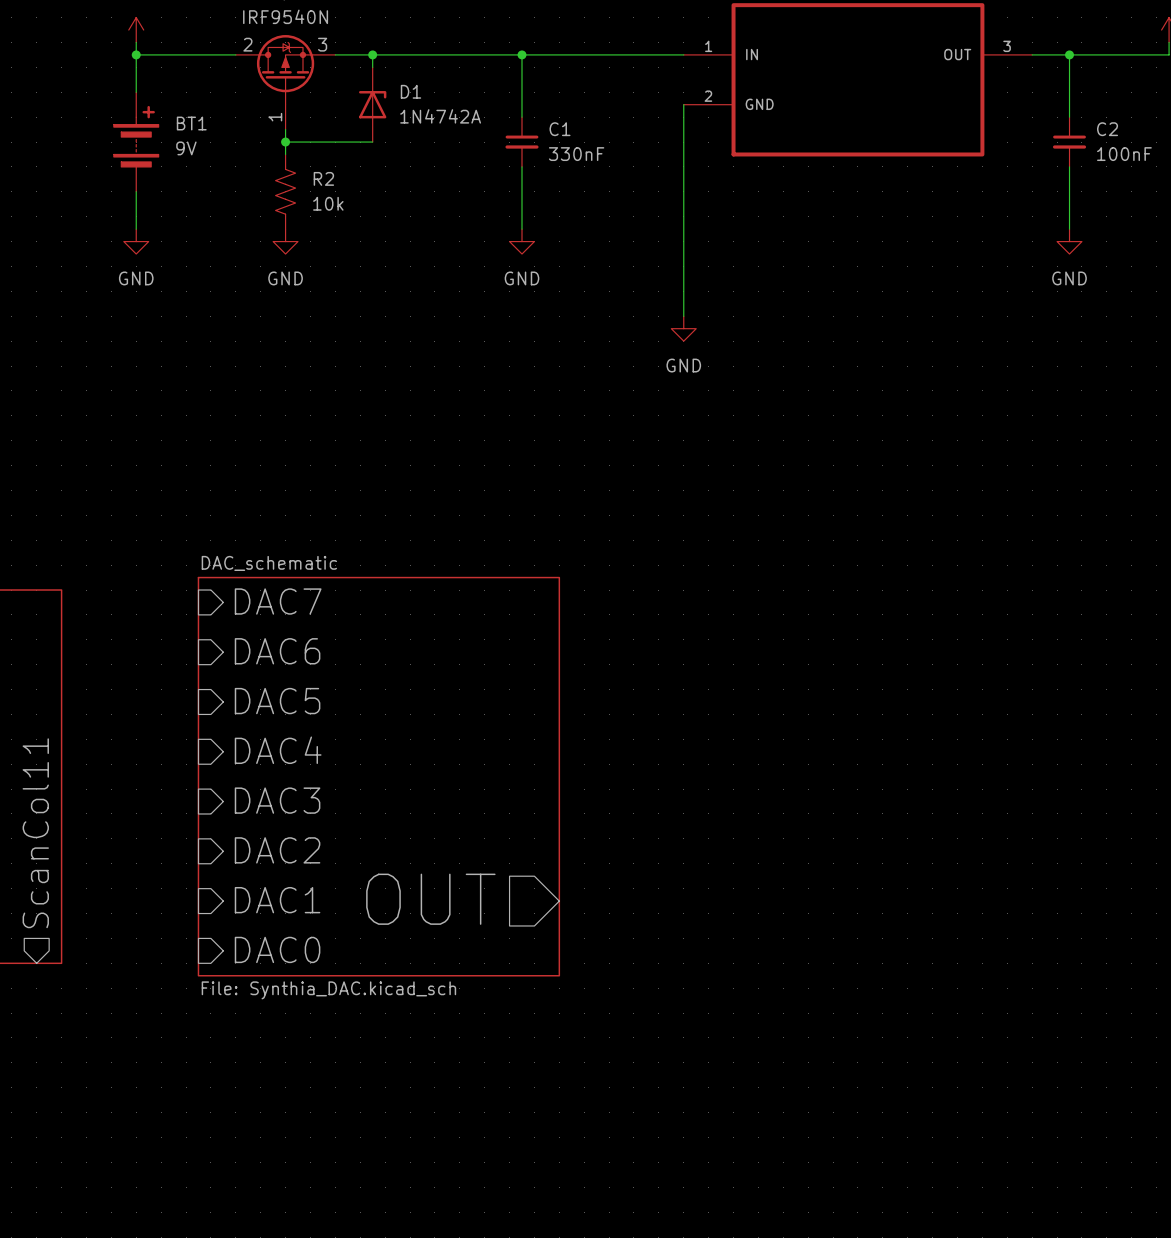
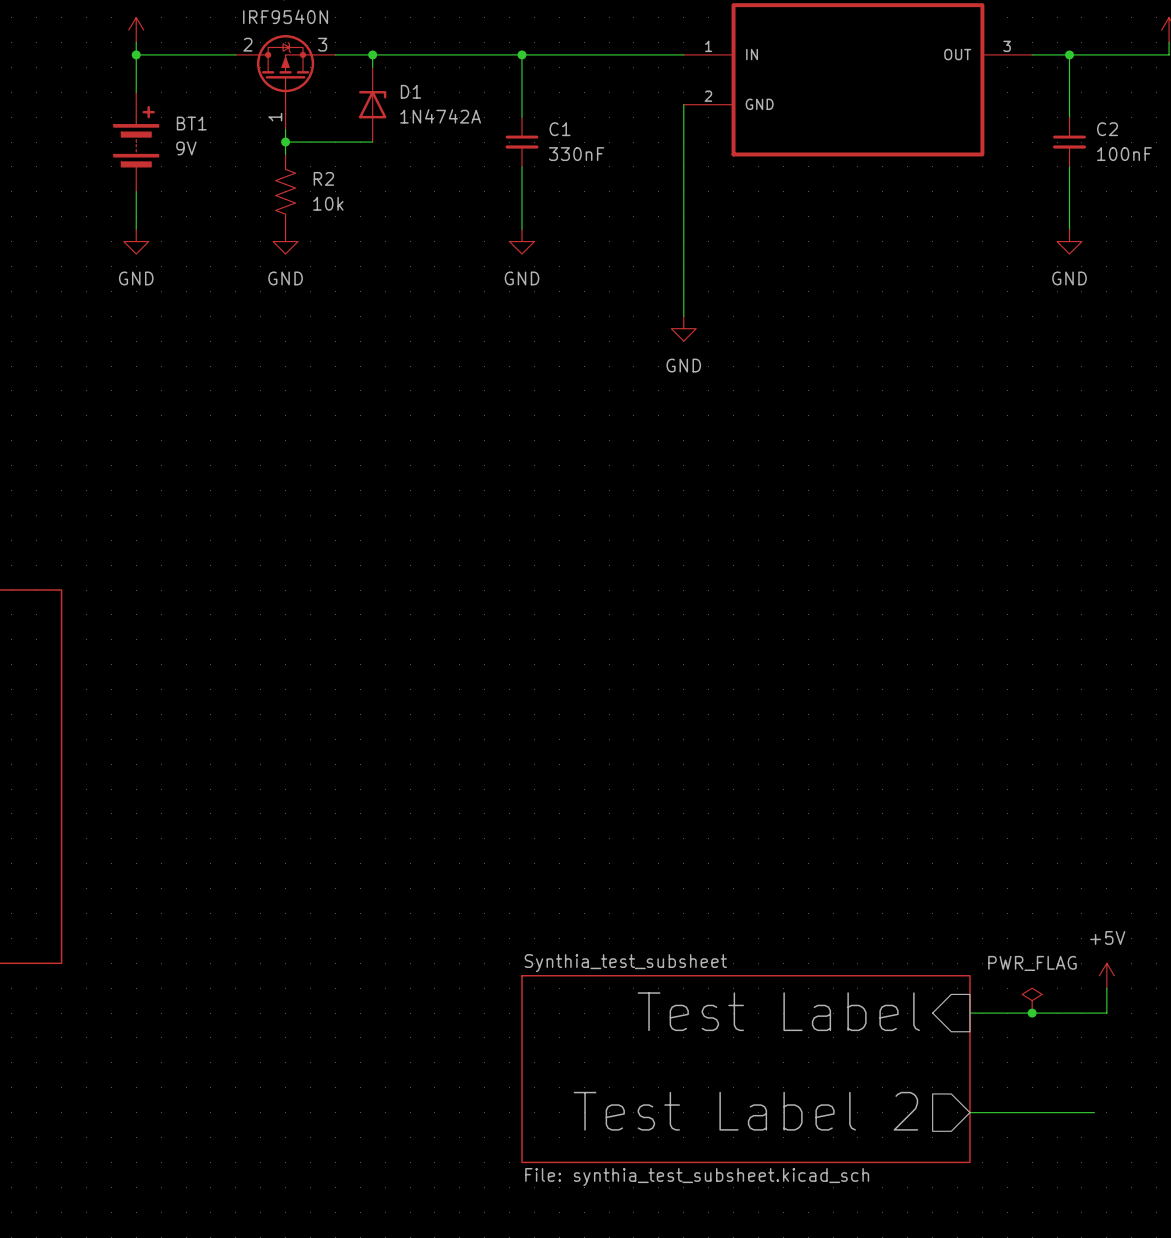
sheet pin: DAC7 (278, 601) -> none
sheet pin: DAC6 (277, 651) -> none
sheet pin: DAC5 (277, 701) -> none
sheet pin: DAC4 (278, 750) -> none
sheet DAC_schematic: File: Synthia_DAC.kicad_sch (378, 776) -> none
sheet pin: DAC3 (277, 800) -> none
sheet pin: ScanCol11 (35, 833) -> none
sheet pin: DAC2 (277, 850) -> none
sheet pin: OUT (430, 899) -> none
sheet pin: DAC1 (277, 900) -> none
sheet pin: DAC0 (277, 949) -> none
power symbol: none -> +5V (1106, 975)
wire: none -> (1106, 988) (1106, 1013) (969, 1013)
power symbol: none -> PWR_FLAG (1032, 1000)
sheet pin: none -> Test Label (778, 1011)
junction: none -> (1032, 1013)
sheet Synthia_test_subsheet: none -> File: synthia_test_subsheet.kicad_sch (745, 1069)
sheet pin: none -> Test Label 2 (745, 1111)
wire: none -> (969, 1112) (1094, 1112)

